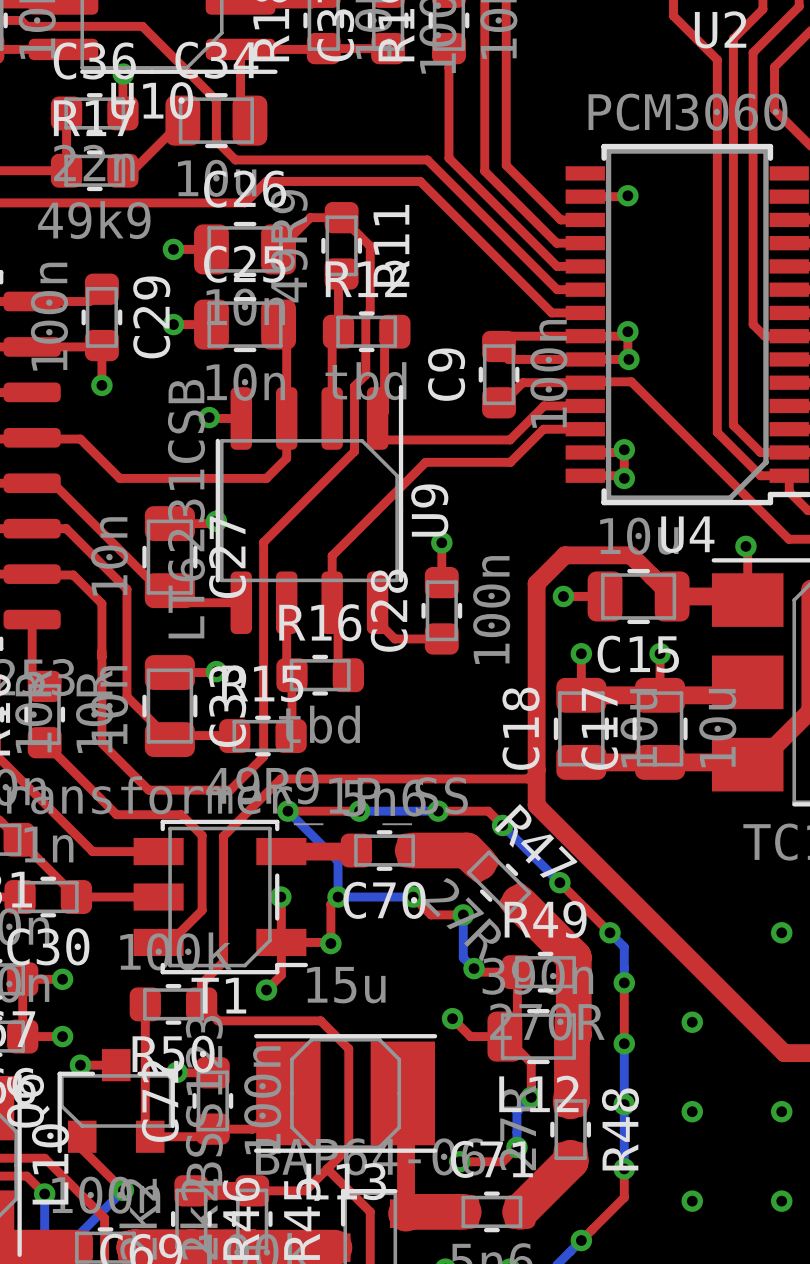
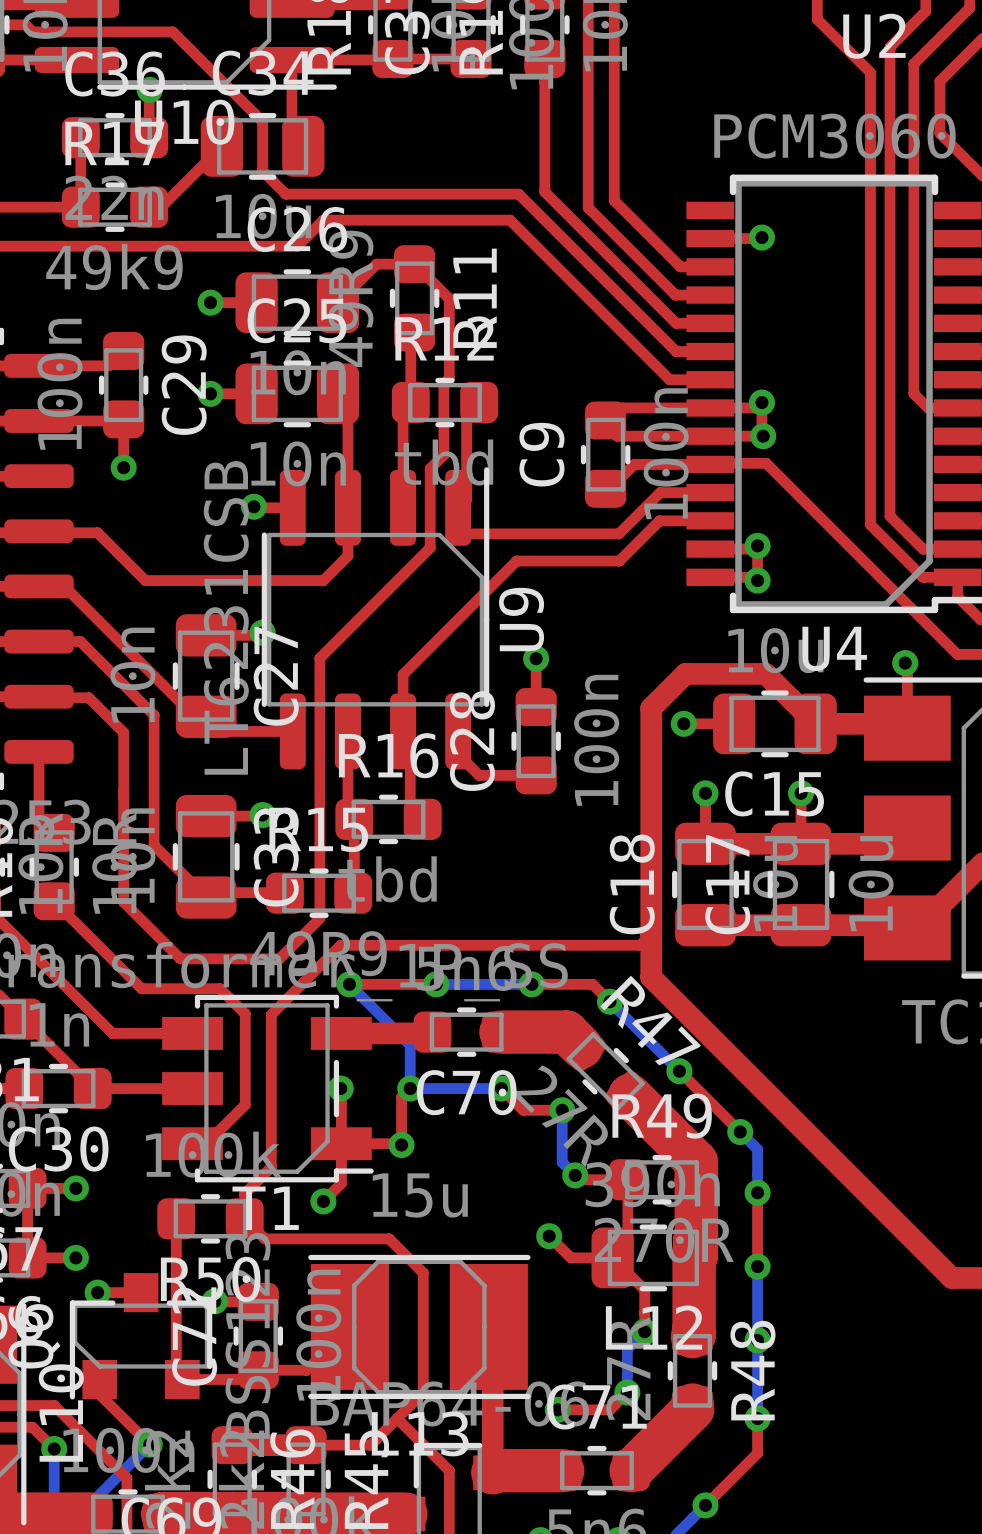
via: (781, 932) -> none
via: (692, 1022) -> none
via: (692, 1111) -> none
via: (781, 1111) -> none
via: (692, 1201) -> none
via: (781, 1201) -> none

